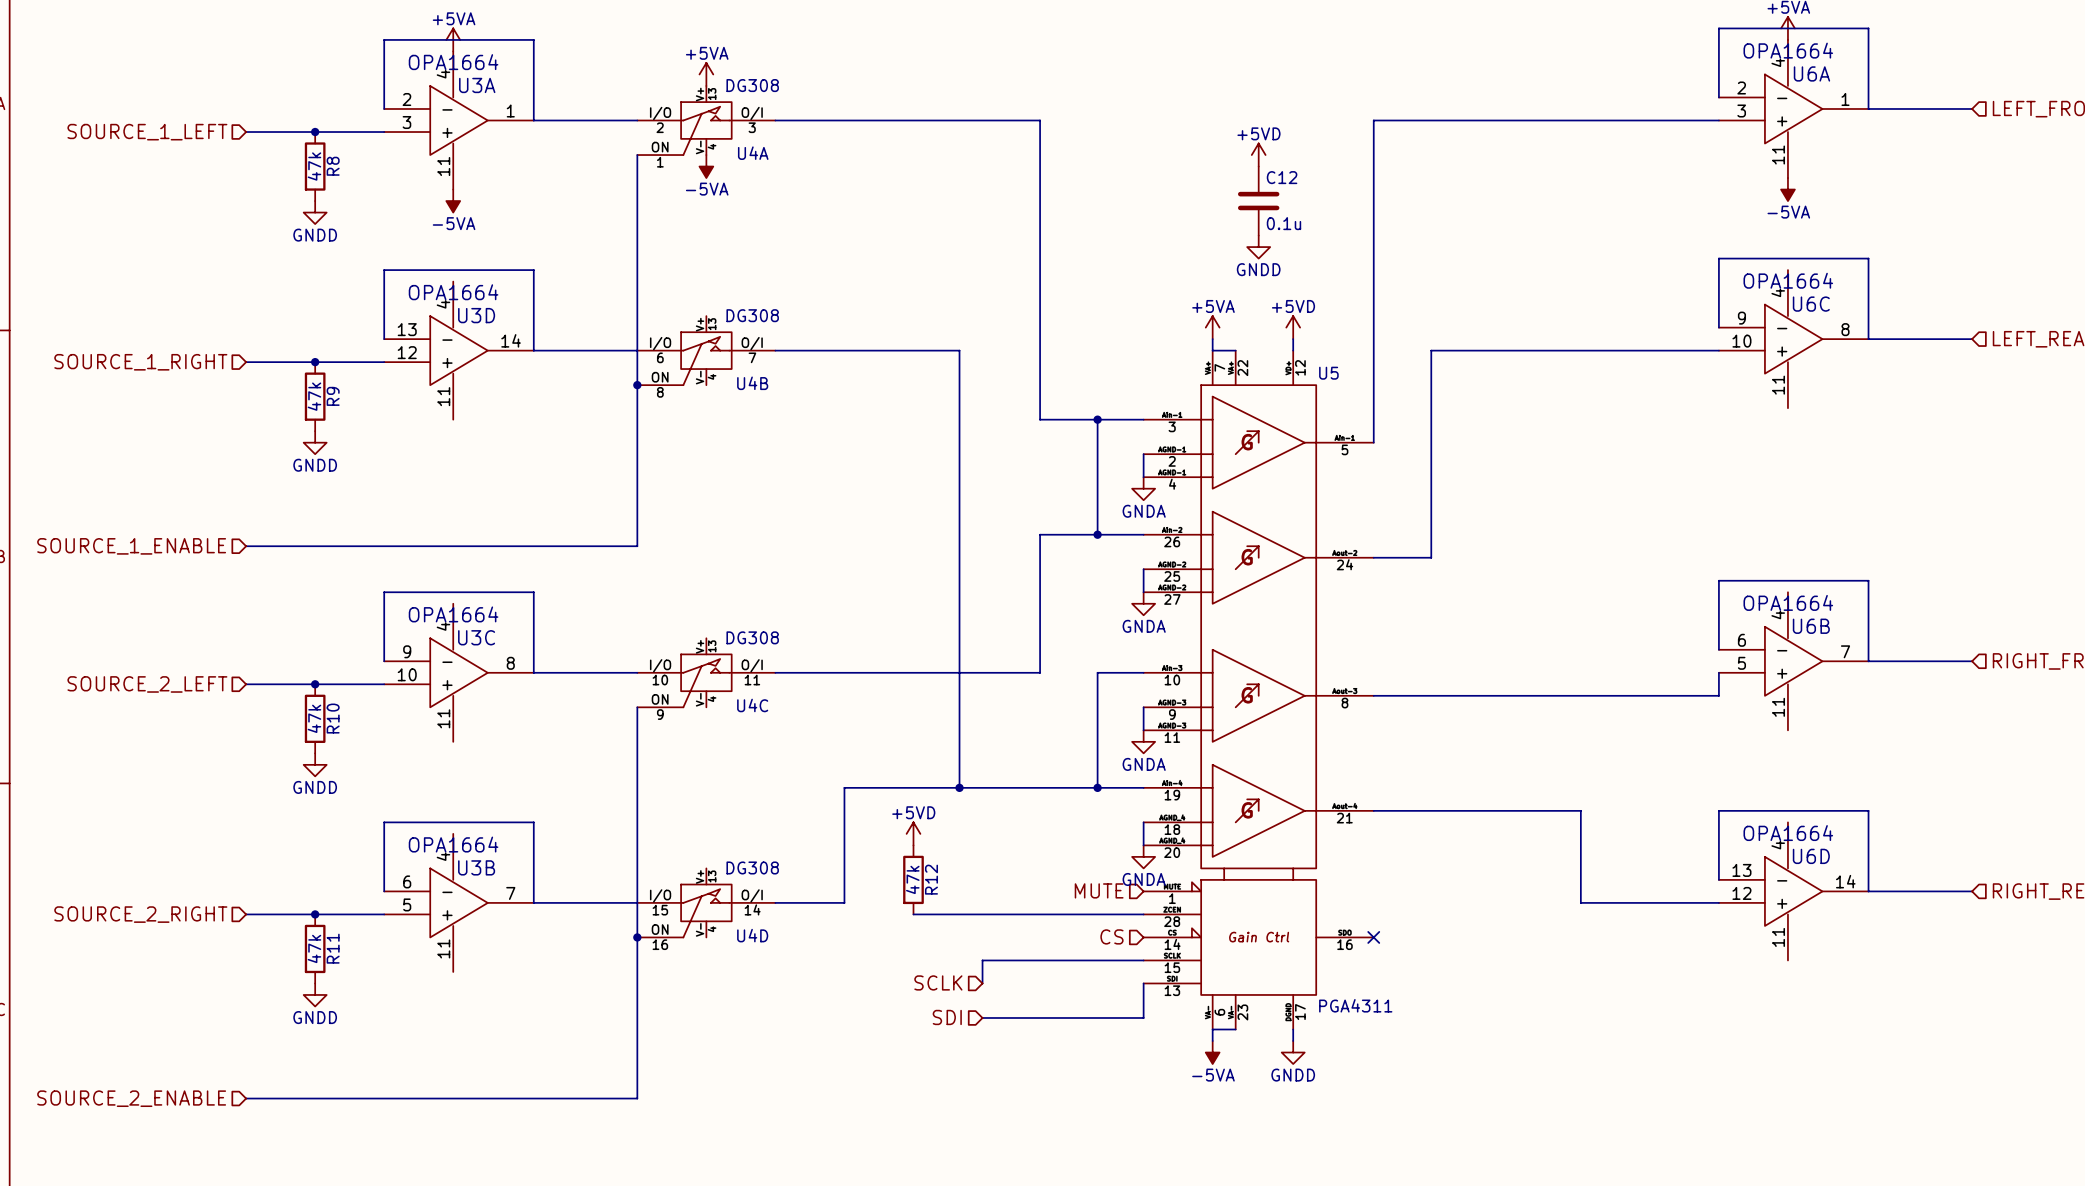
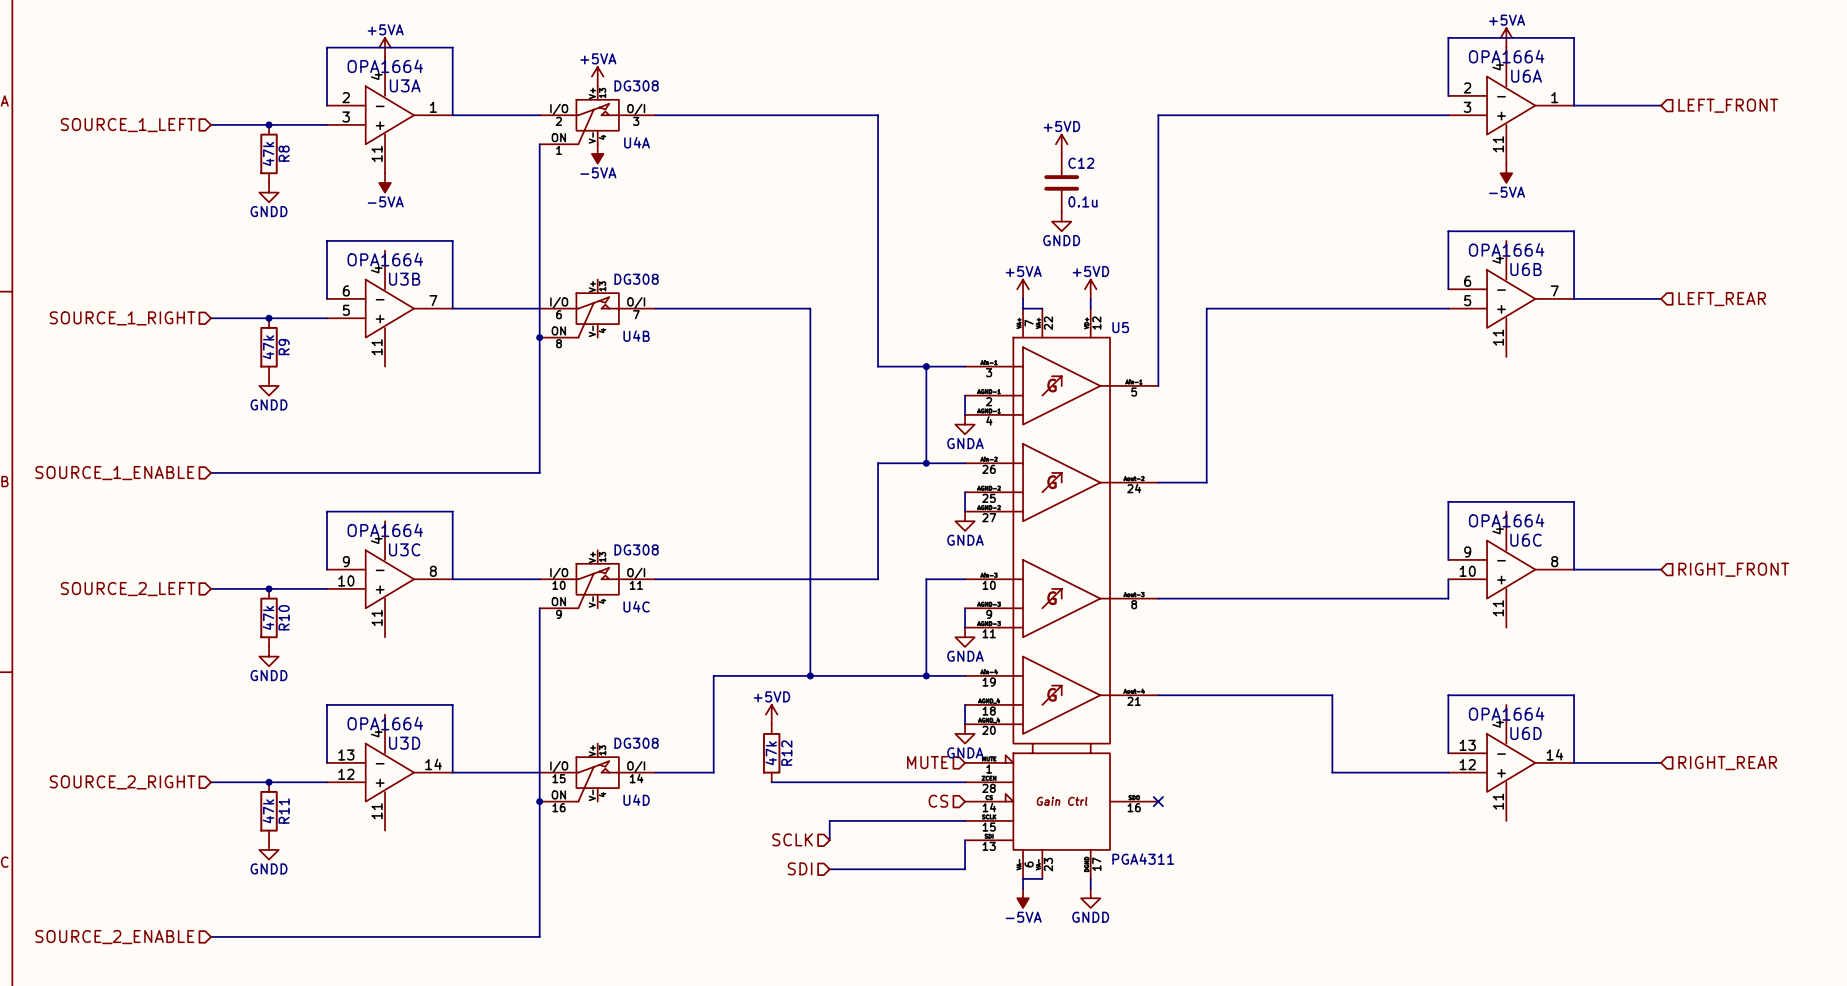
U6C position: (1793, 339) -> (1511, 569)
U3D position: (458, 350) -> (389, 772)
U6B position: (1793, 661) -> (1511, 298)
U3B position: (458, 902) -> (389, 308)

